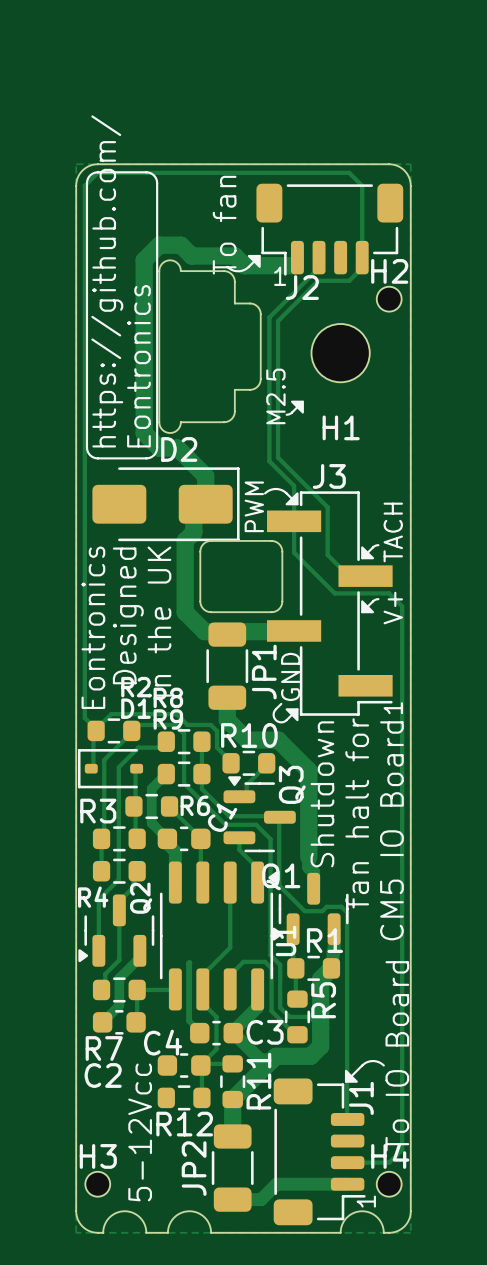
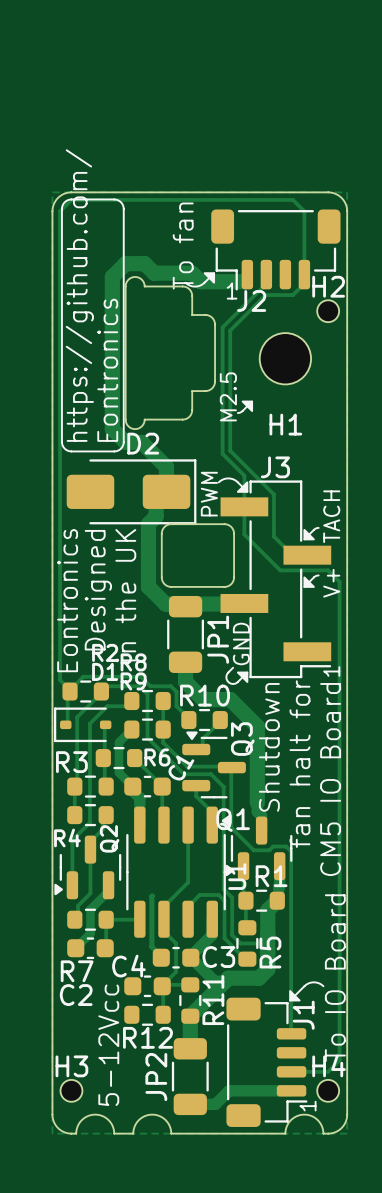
R5 name position: R5 (323, 1000) -> R5 (270, 952)

